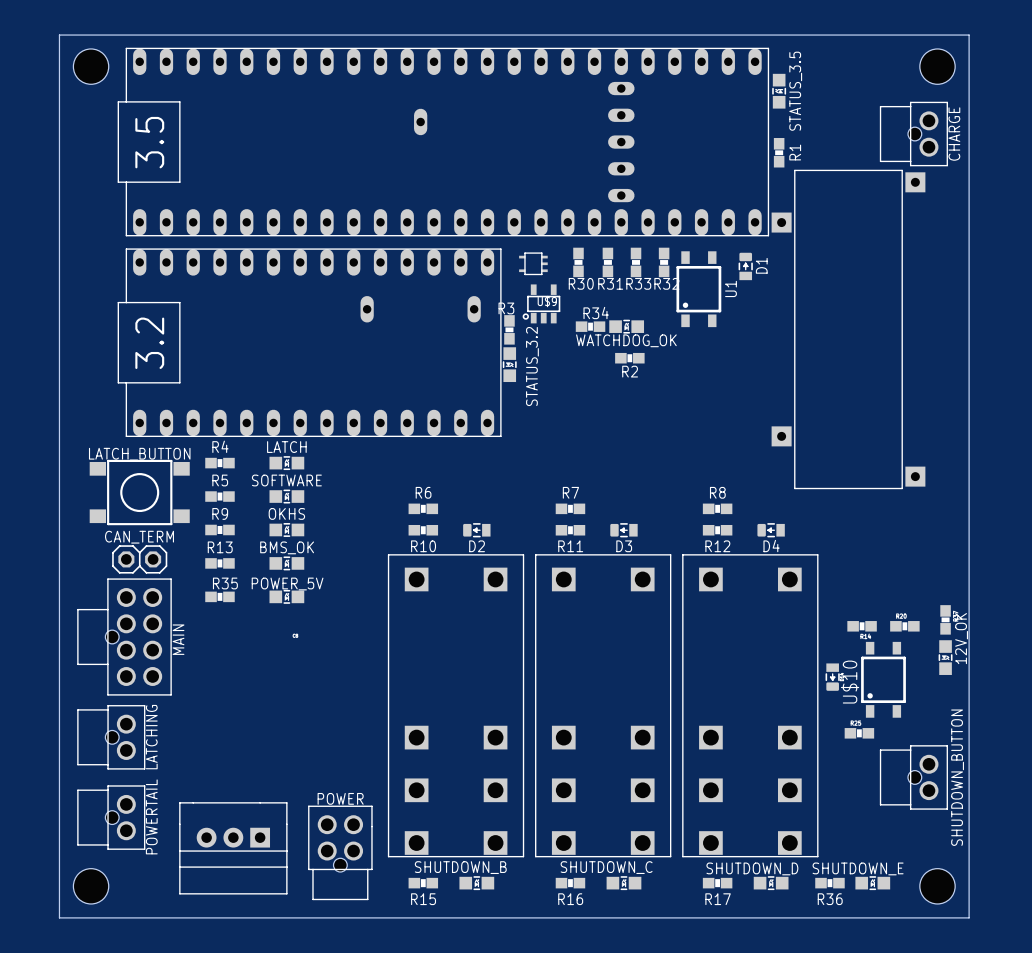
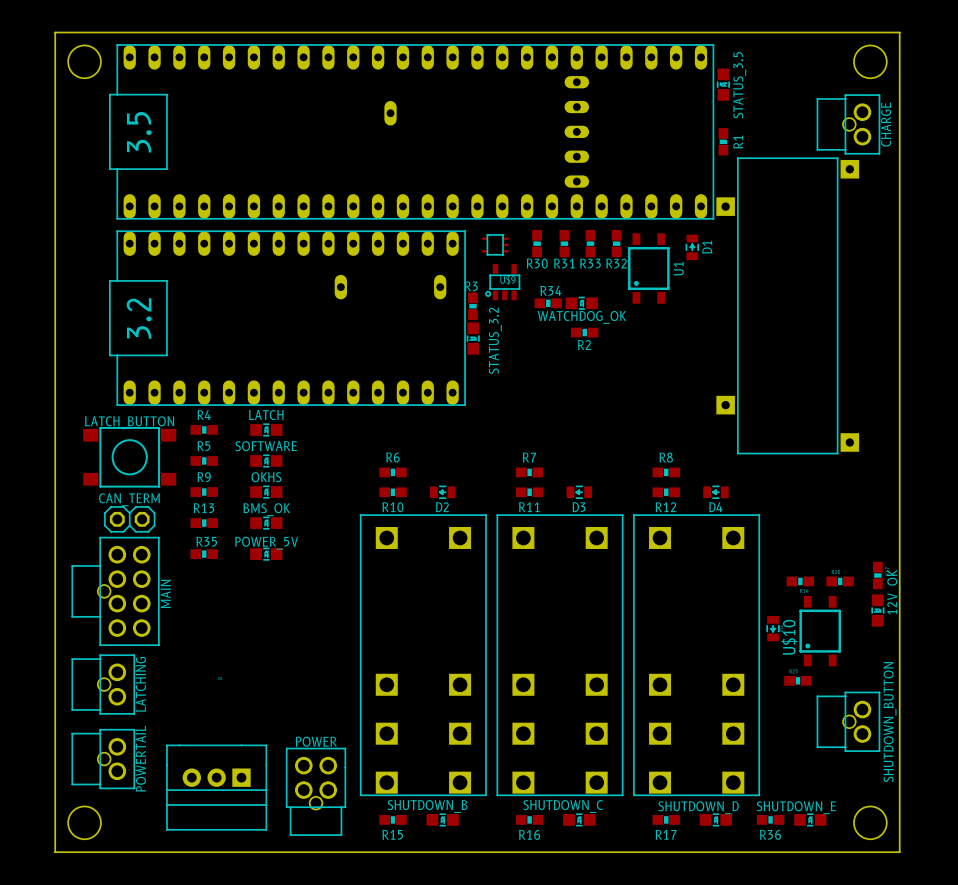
part position: (295, 635) -> (220, 678)

